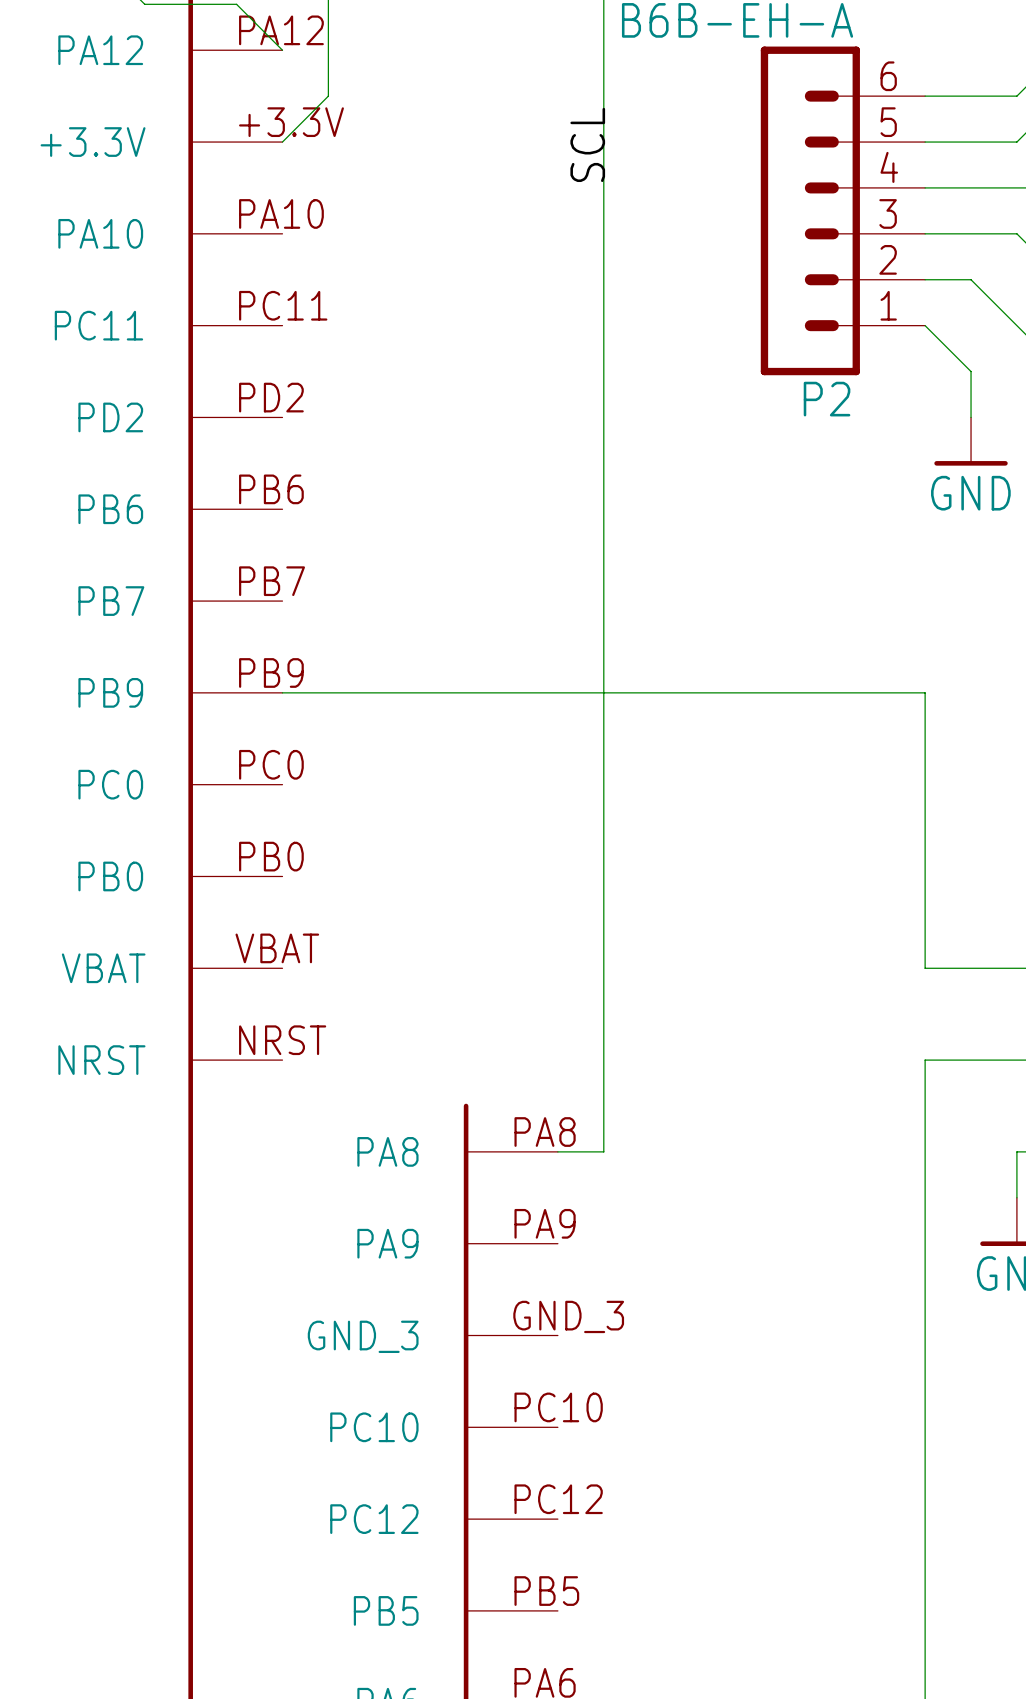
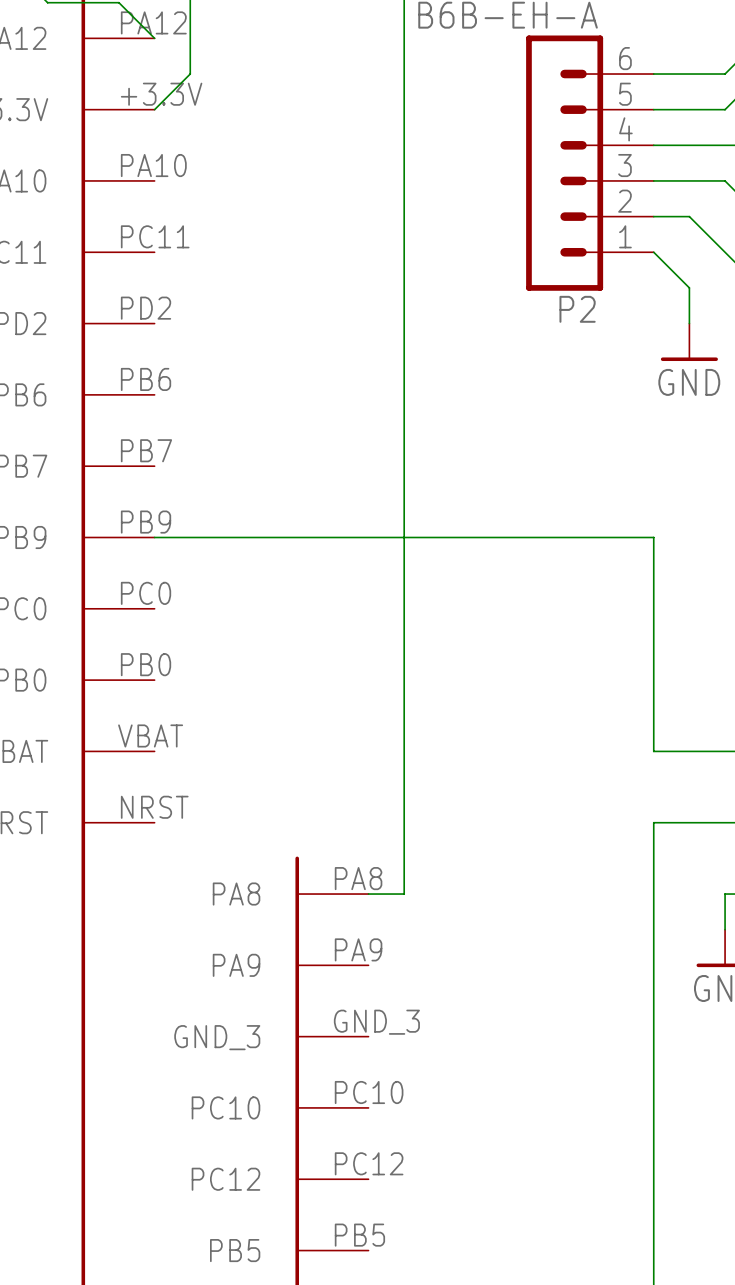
label: SCL (587, 144) -> none

